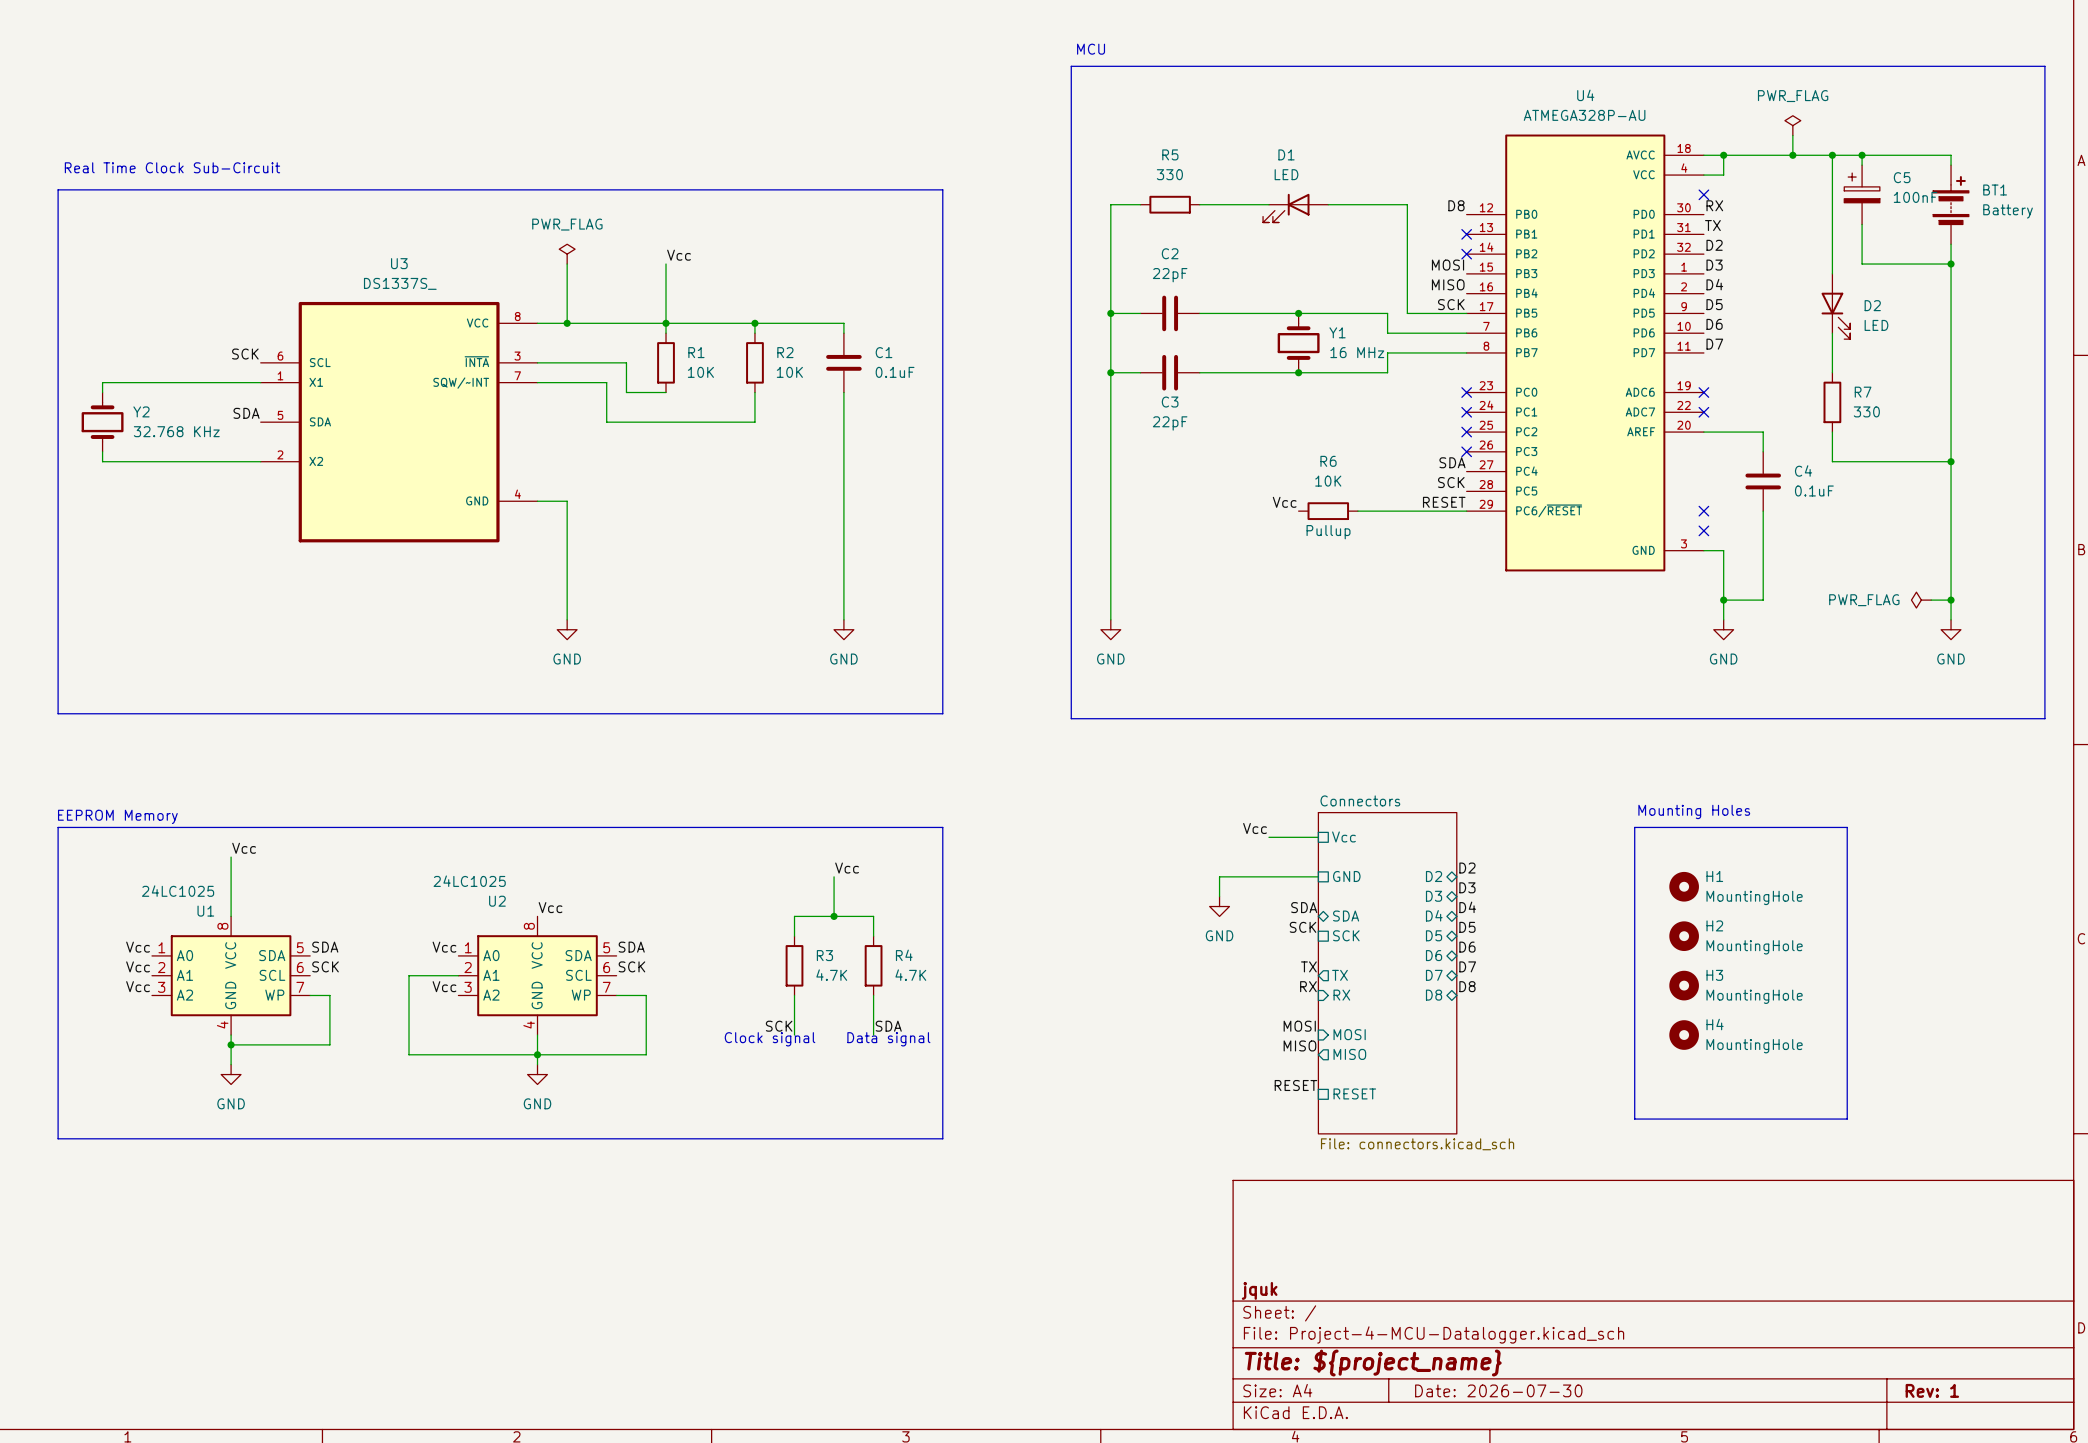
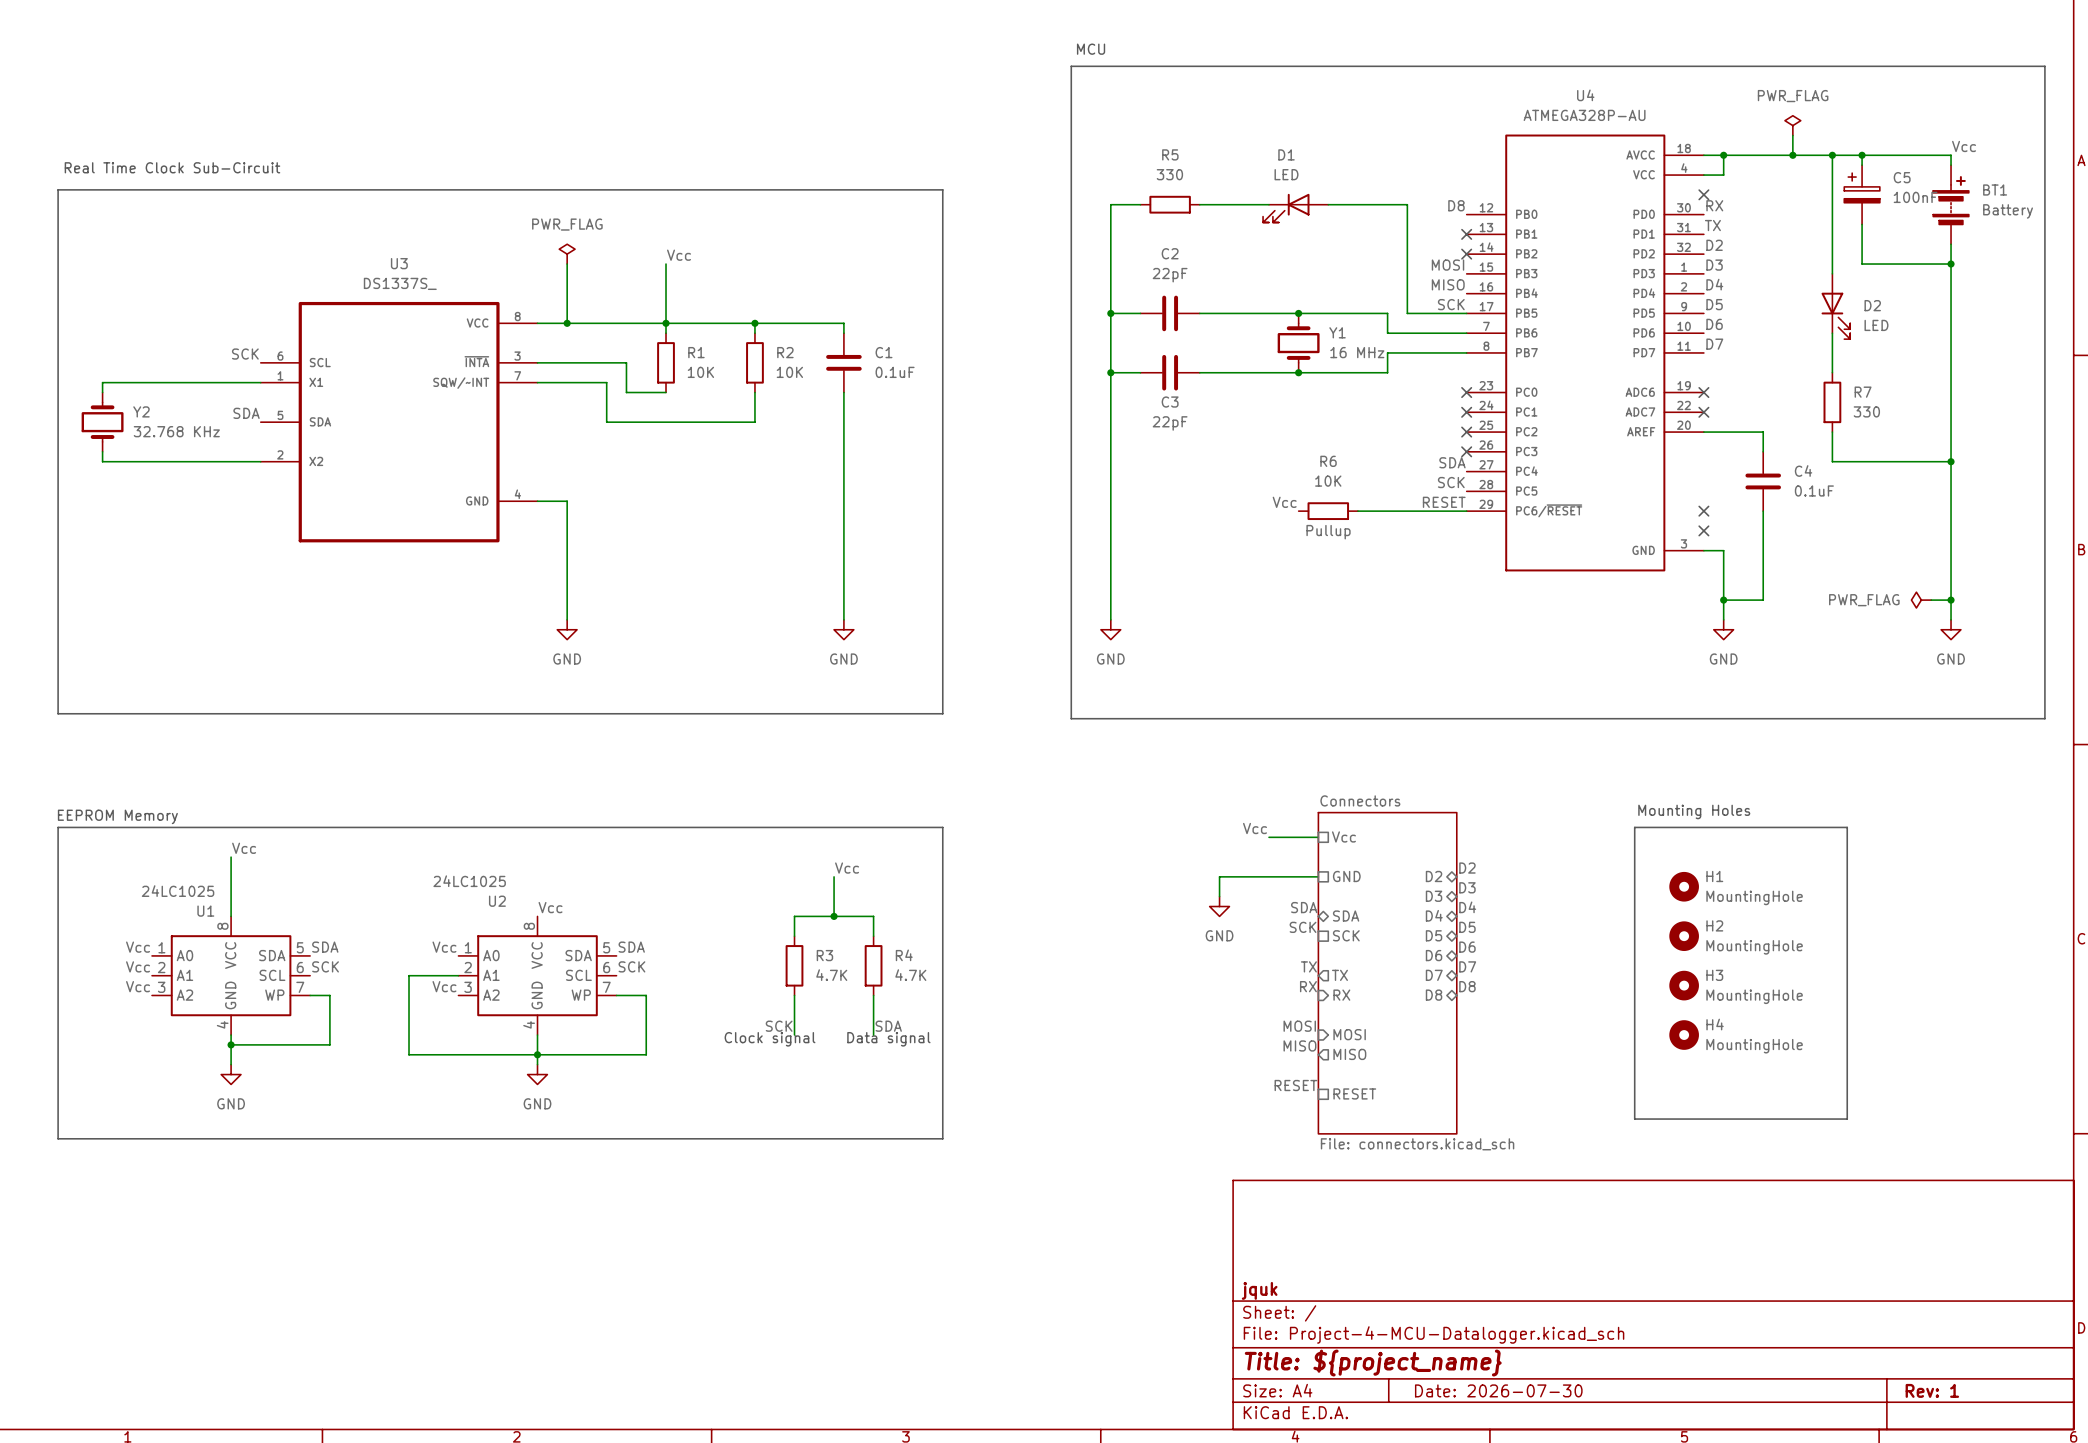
label: none -> Vcc (1964, 146)

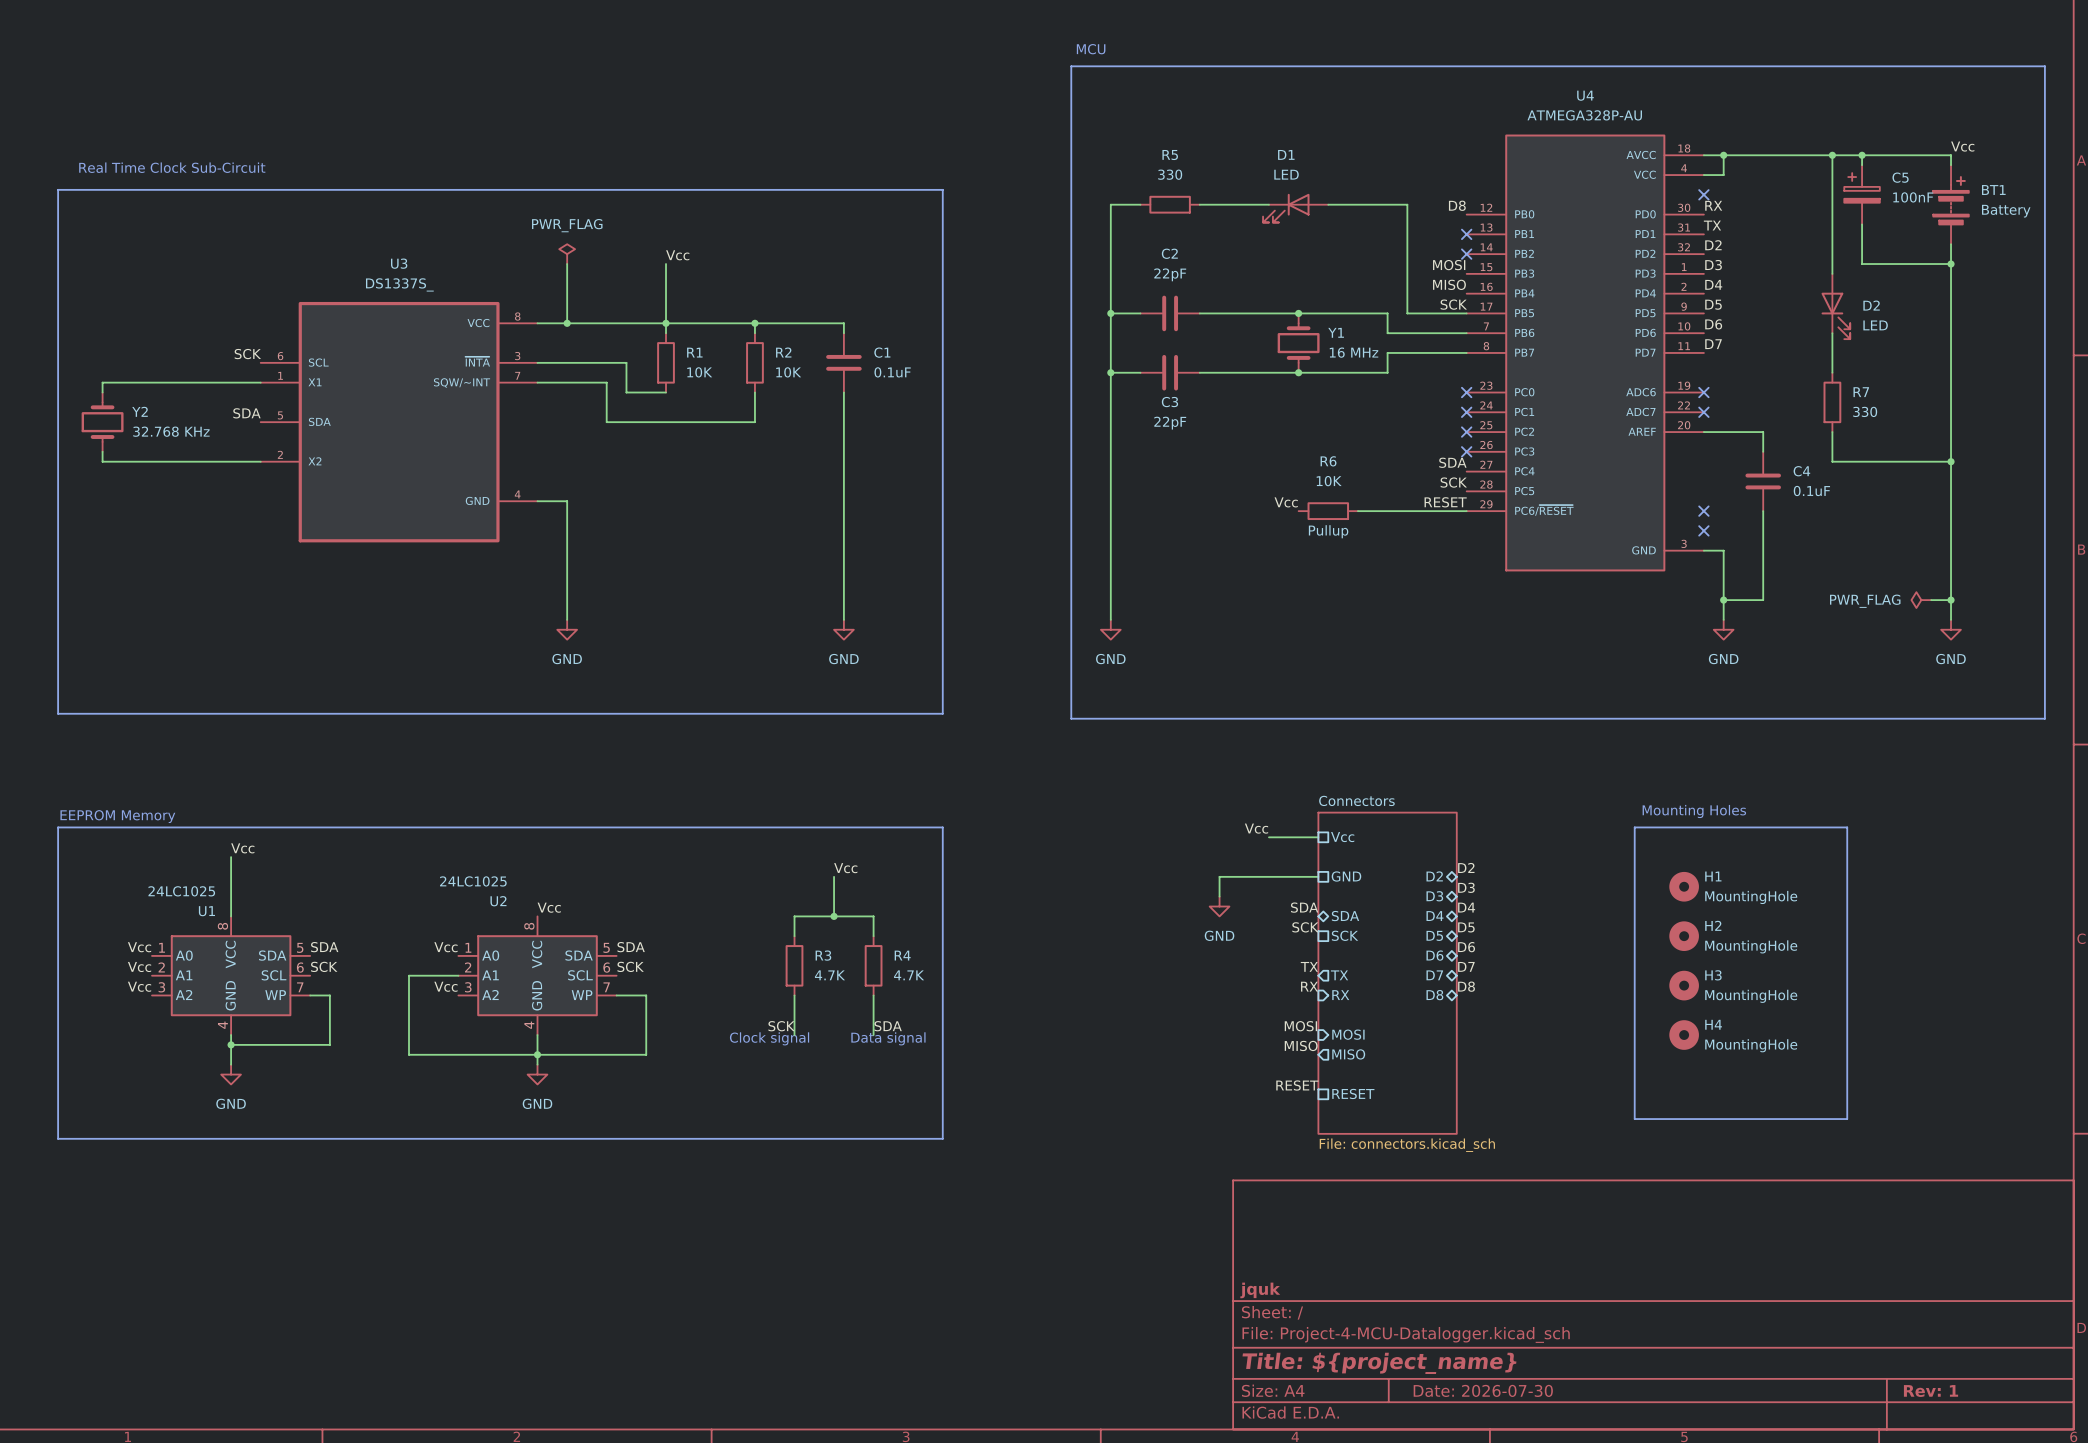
power symbol: PWR_FLAG (1792, 125) -> none
wire: (1792, 135) (1792, 155) -> none
junction: (1792, 155) -> none

